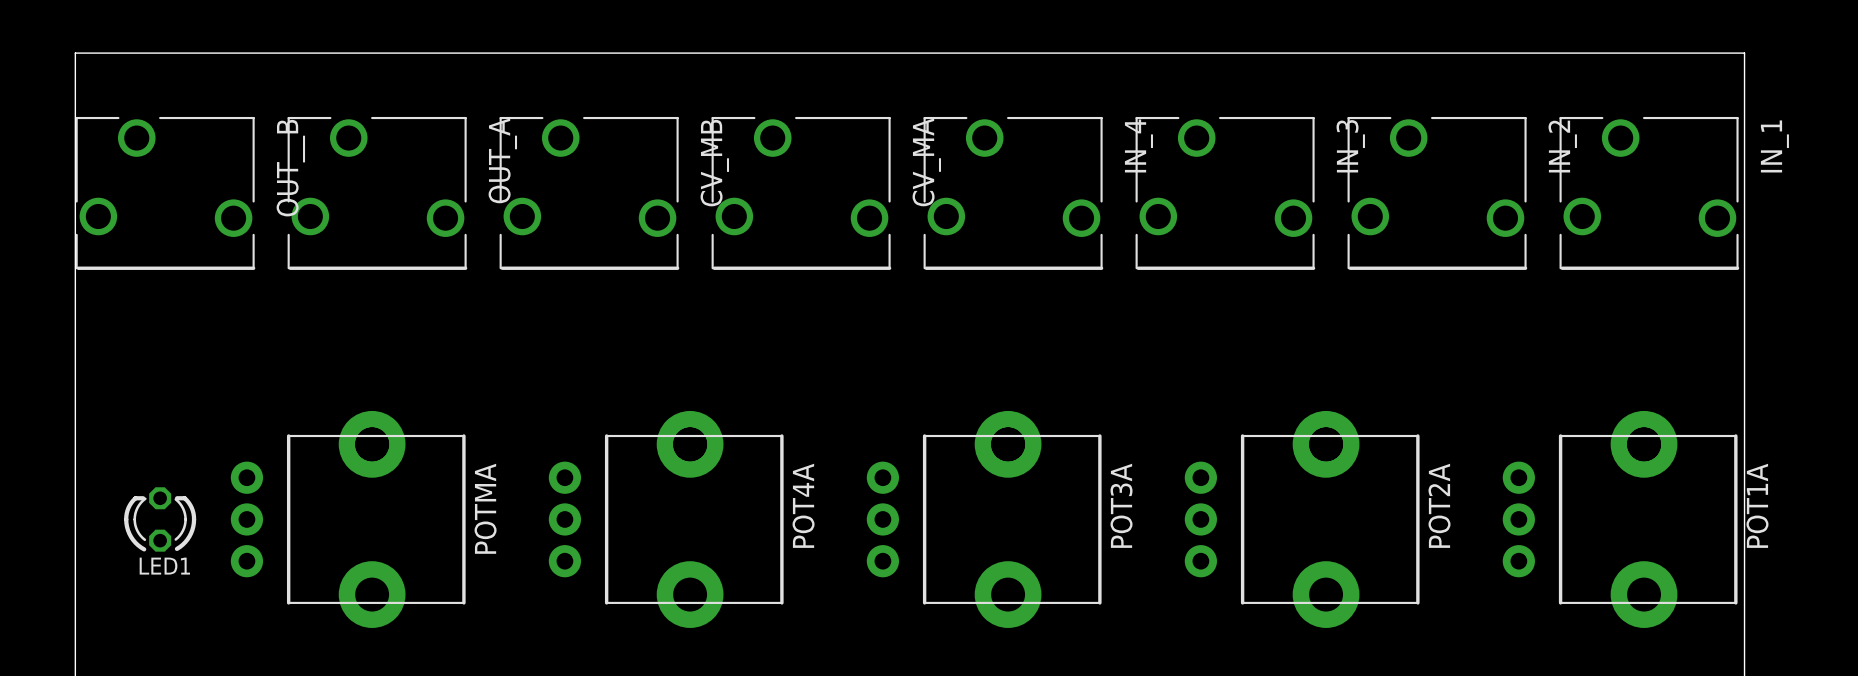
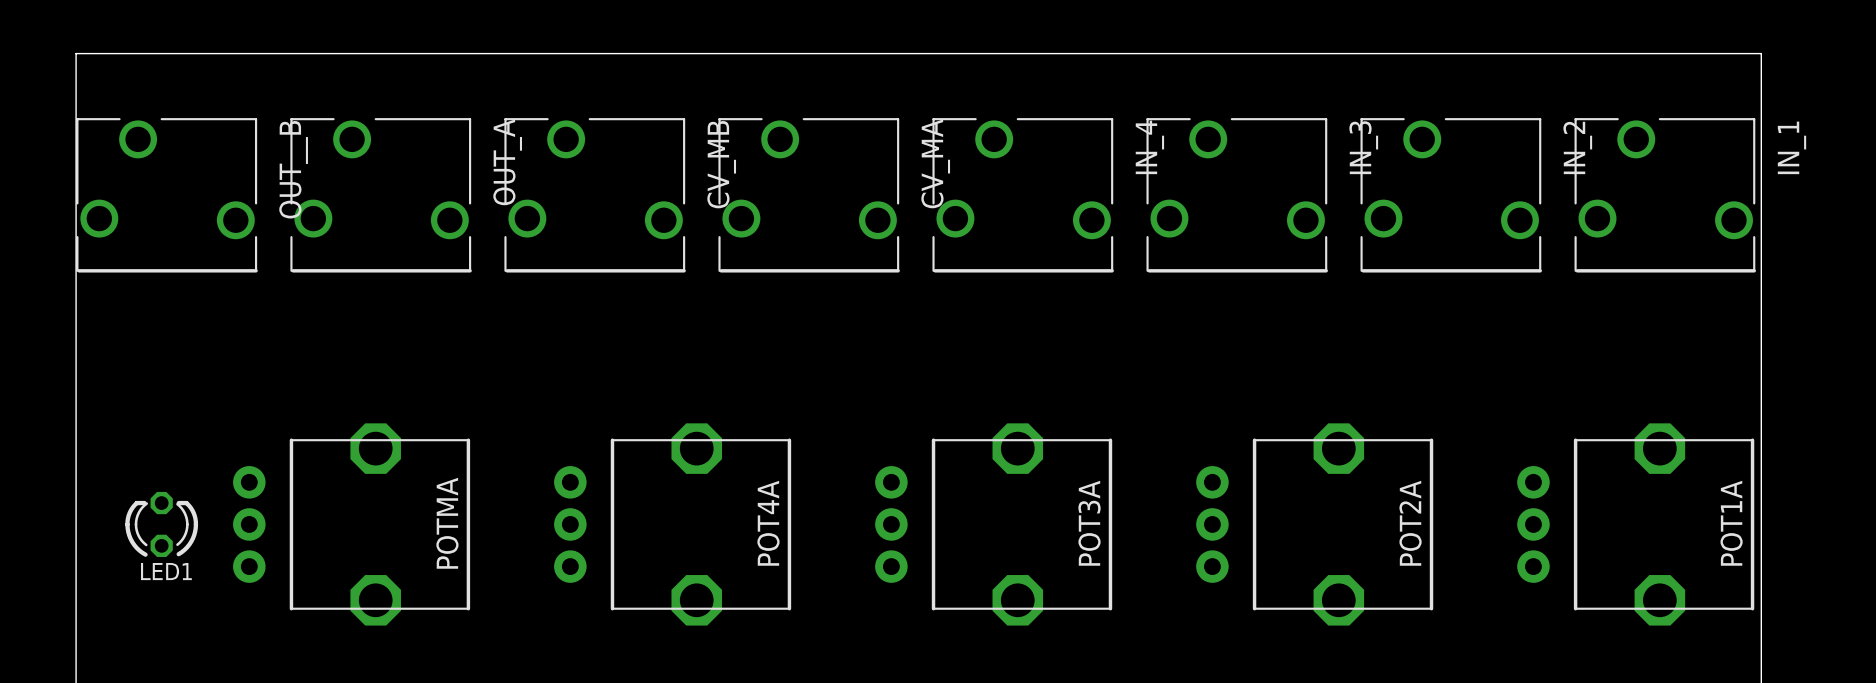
POTMA footprint: [230, 410, 466, 628] -> [233, 423, 471, 626]
POT4A footprint: [548, 410, 784, 628] -> [554, 423, 792, 626]
POT3A footprint: [866, 410, 1102, 628] -> [875, 423, 1113, 626]
POT2A footprint: [1184, 410, 1420, 628] -> [1196, 423, 1434, 626]
POT1A footprint: [1502, 410, 1738, 628] -> [1517, 423, 1755, 626]
POT4A name position: POT4A (803, 505) -> POT4A (768, 523)
POT3A name position: POT3A (1121, 505) -> POT3A (1089, 523)
POT2A name position: POT2A (1439, 505) -> POT2A (1410, 523)
POT1A name position: POT1A (1757, 505) -> POT1A (1731, 523)
POTMA name position: POTMA (485, 508) -> POTMA (447, 523)

